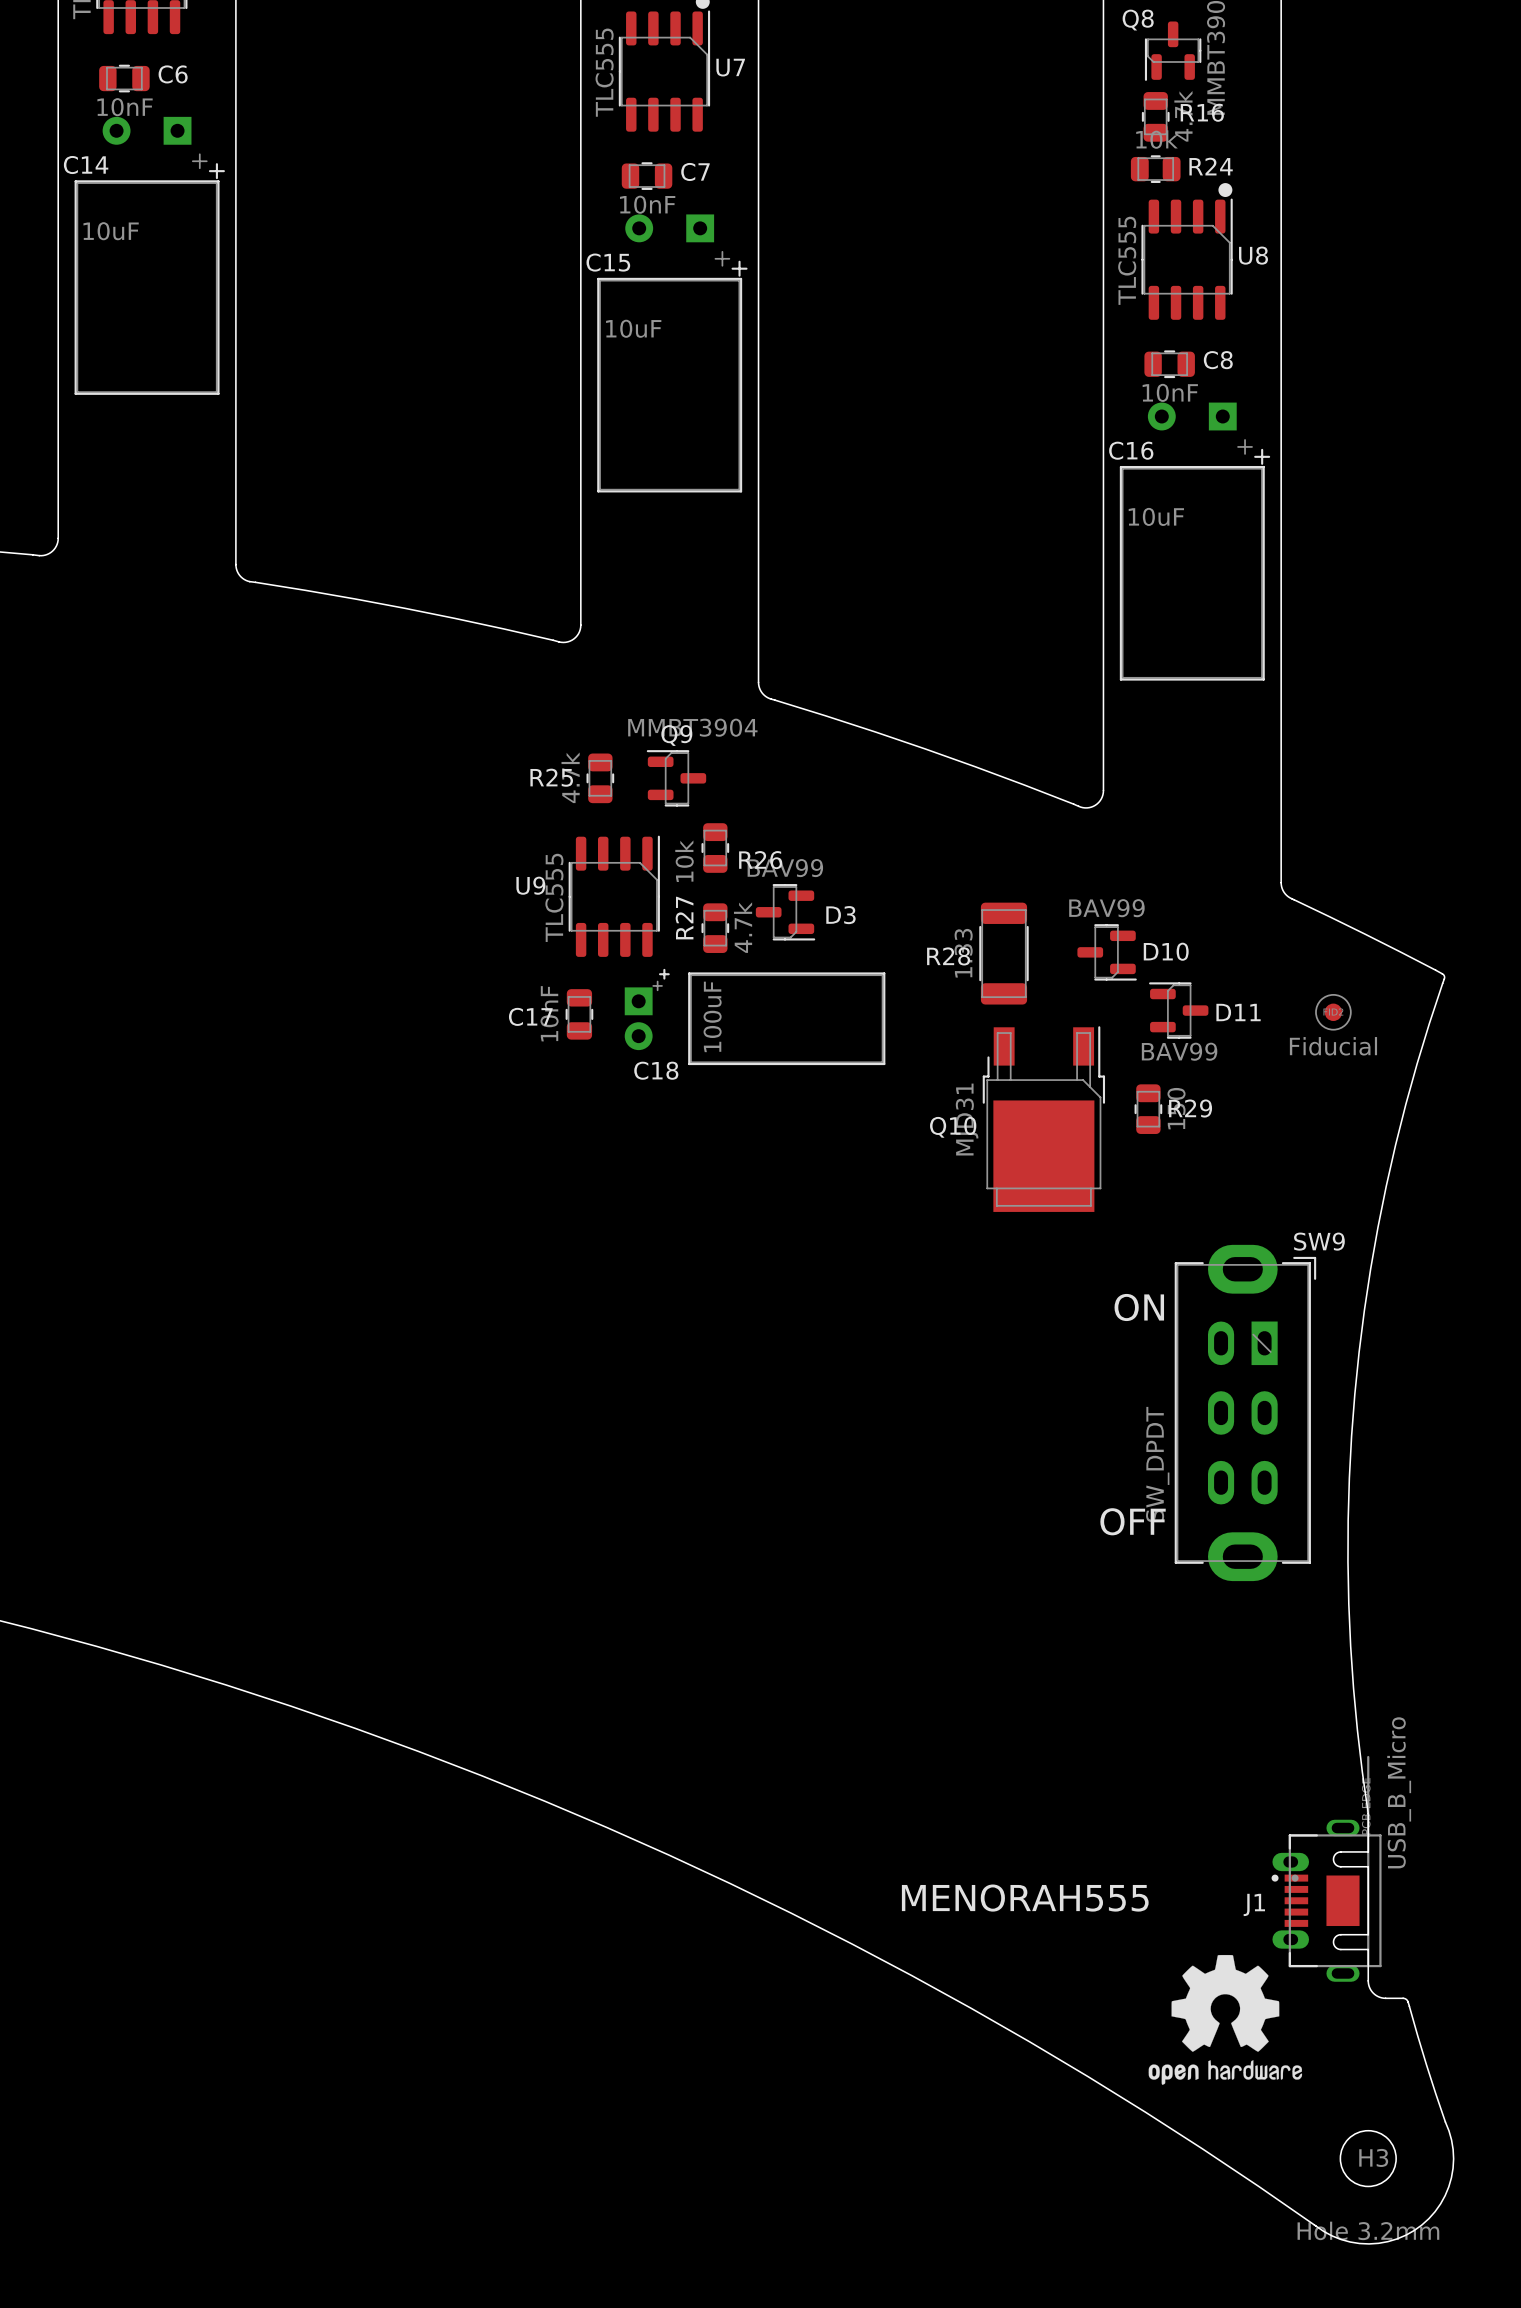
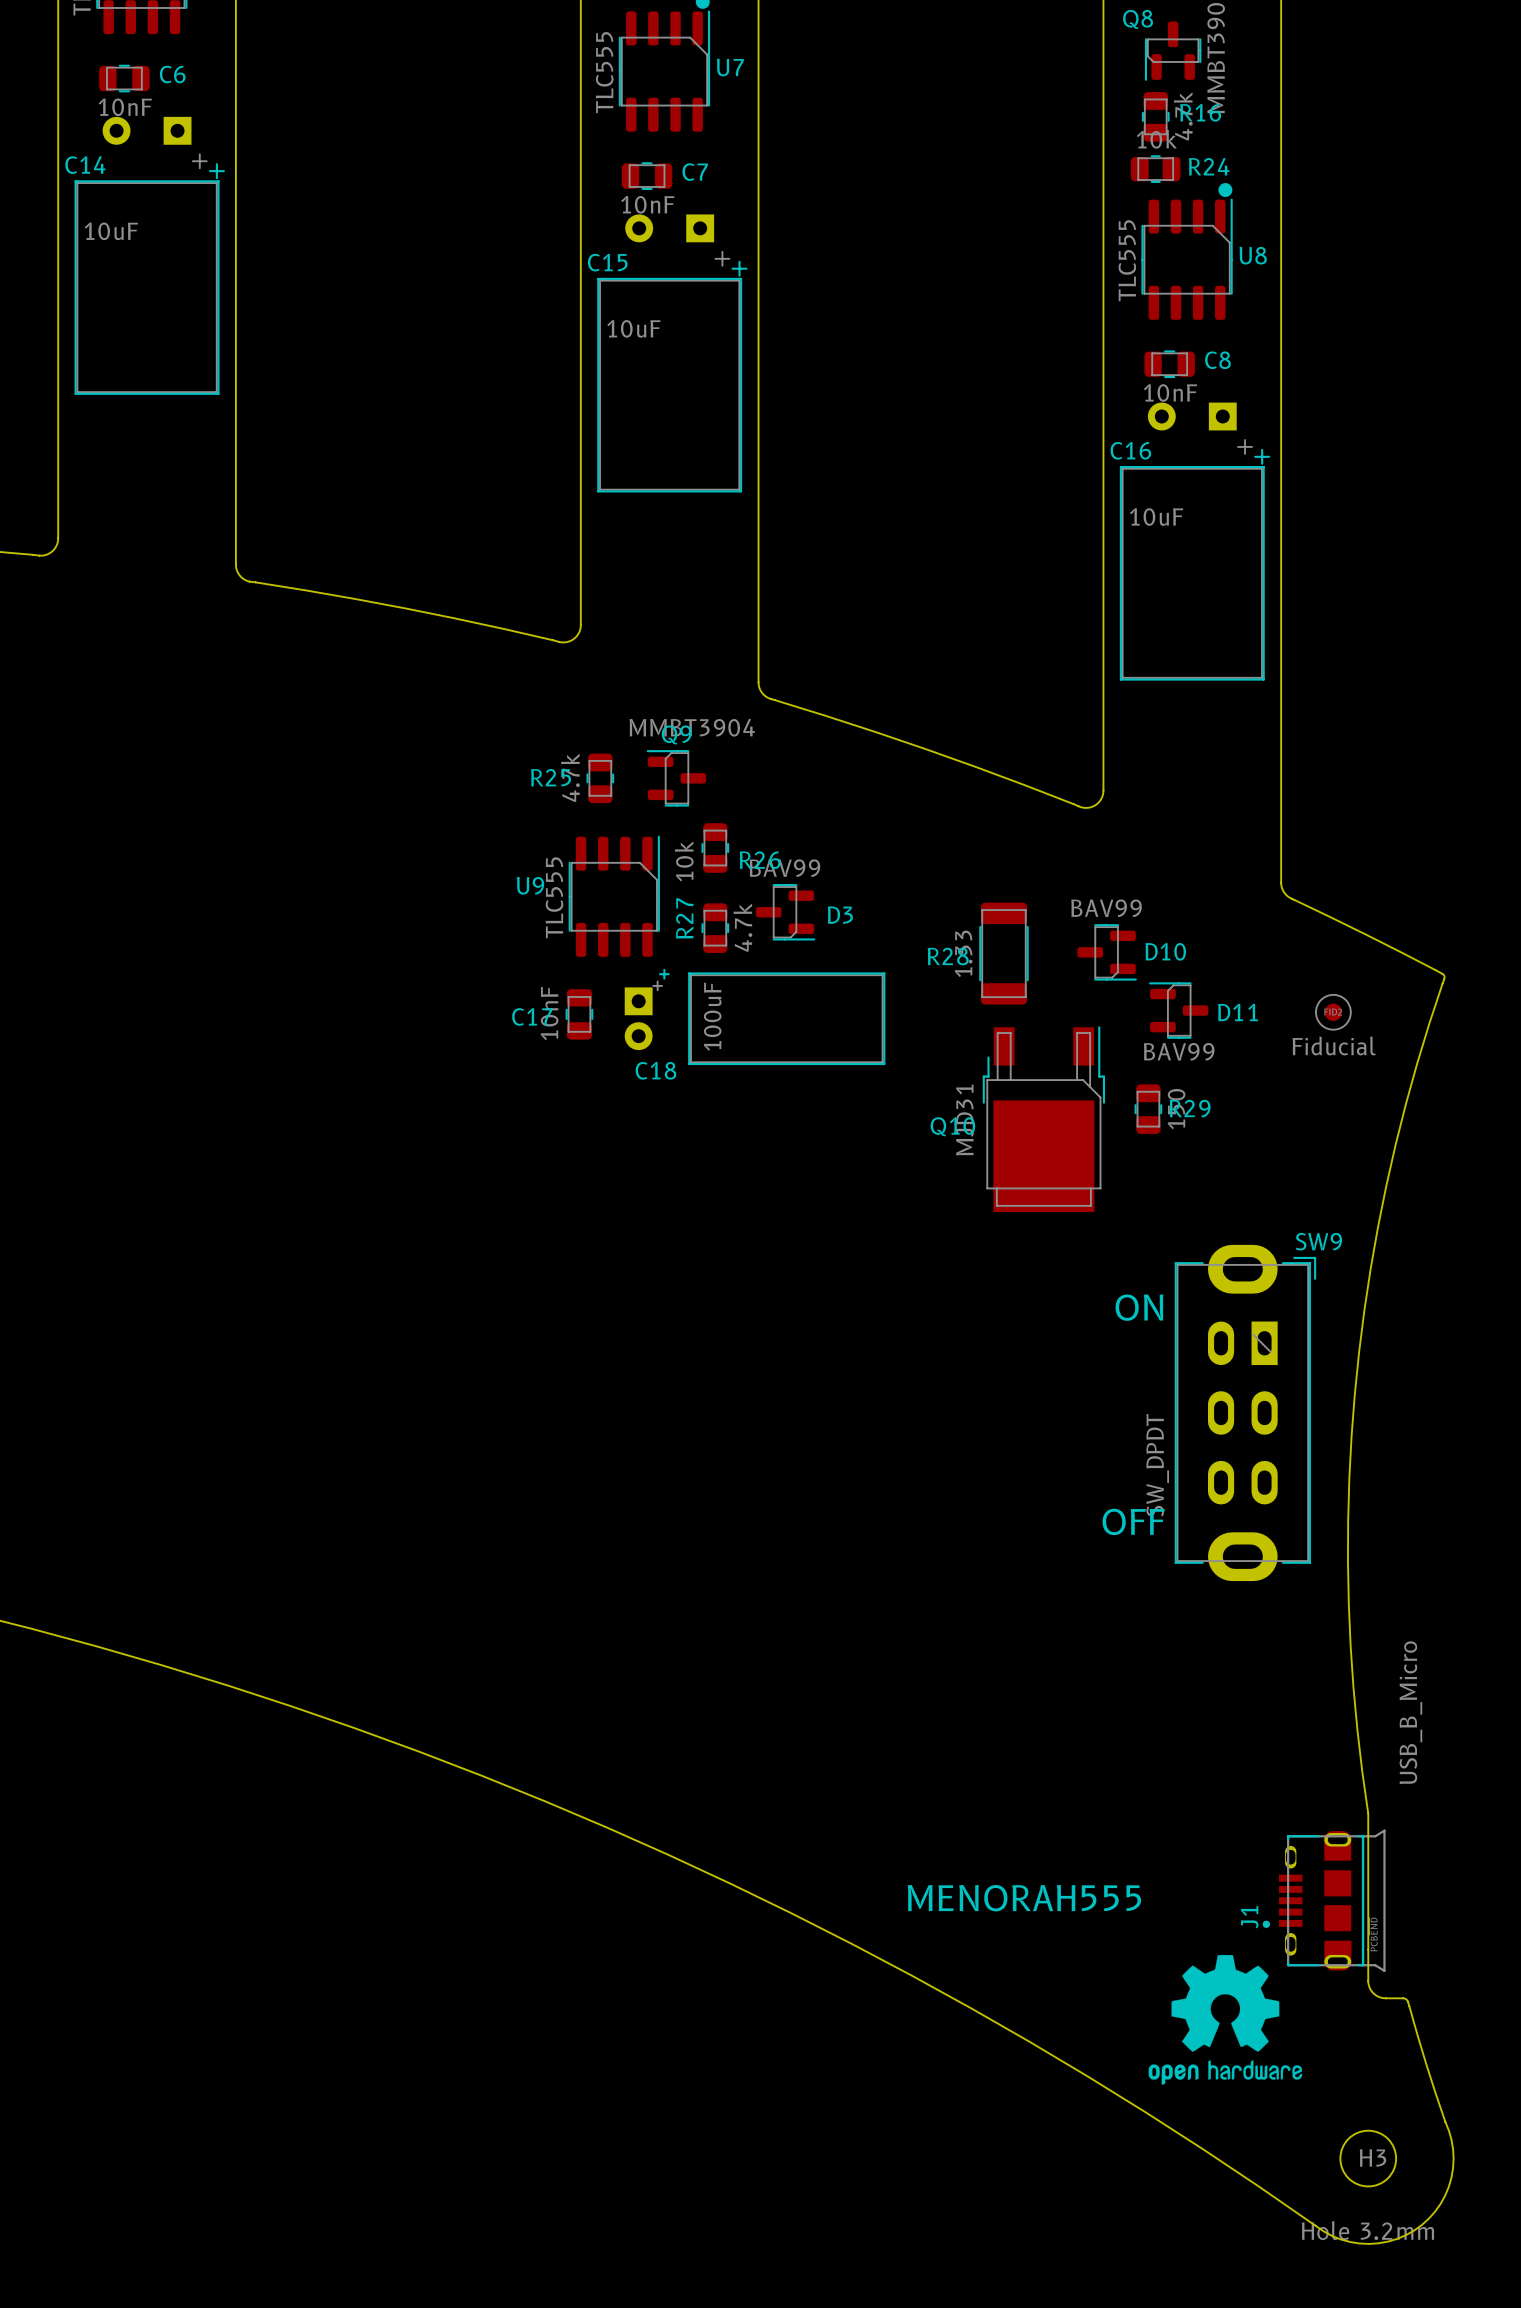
J1 footprint: [1271, 1755, 1382, 1982] -> [1262, 1829, 1386, 1972]
J1 value position: USB_B_Micro (1399, 1792) -> USB_B_Micro (1410, 1712)
board edge: (1368, 1851) (1339, 1852) (1335, 1854) (1333, 1859) (1335, 1864) (1339, 1866) (1368, 1866) -> (1368, 1851) (1368, 1866)
board edge: (1368, 1934) (1339, 1934) (1334, 1937) (1333, 1942) (1334, 1946) (1339, 1949) (1368, 1949) -> (1368, 1934) (1368, 1949)

